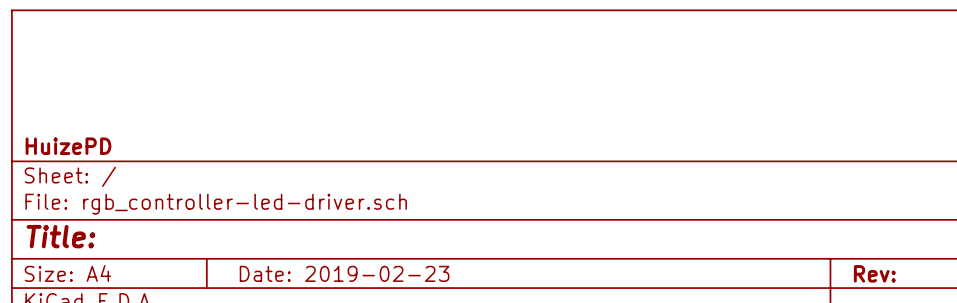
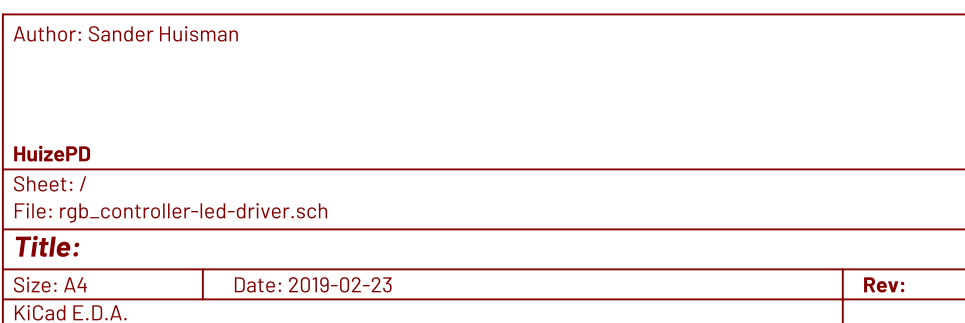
title block: none -> Author: Sander Huisman (125, 33)

